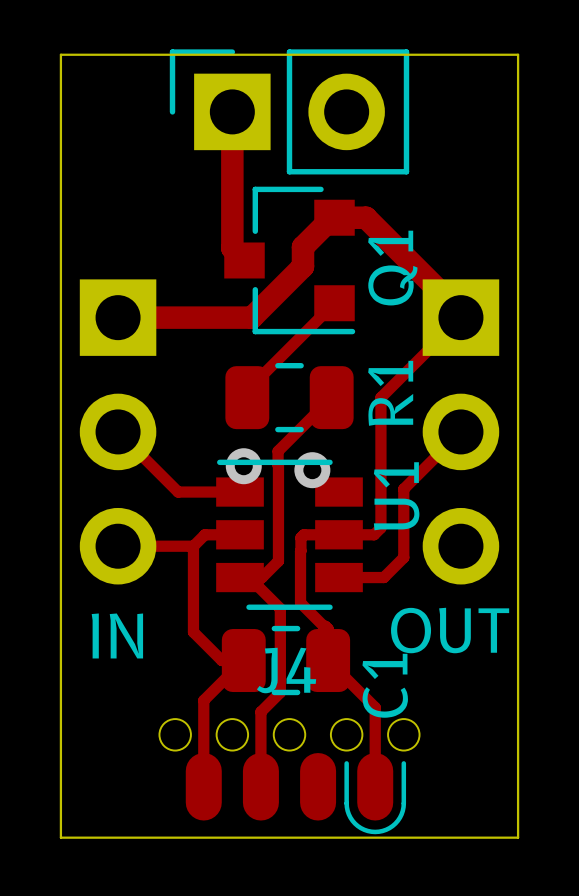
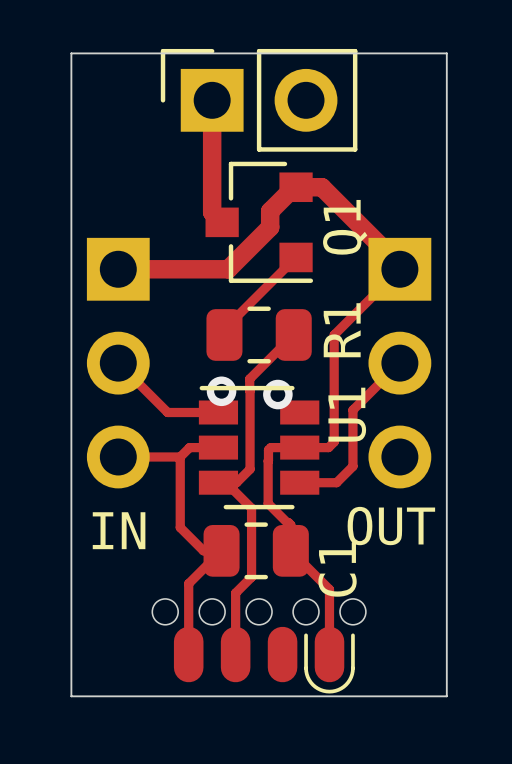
J4 name: J4 (286, 670) -> none

